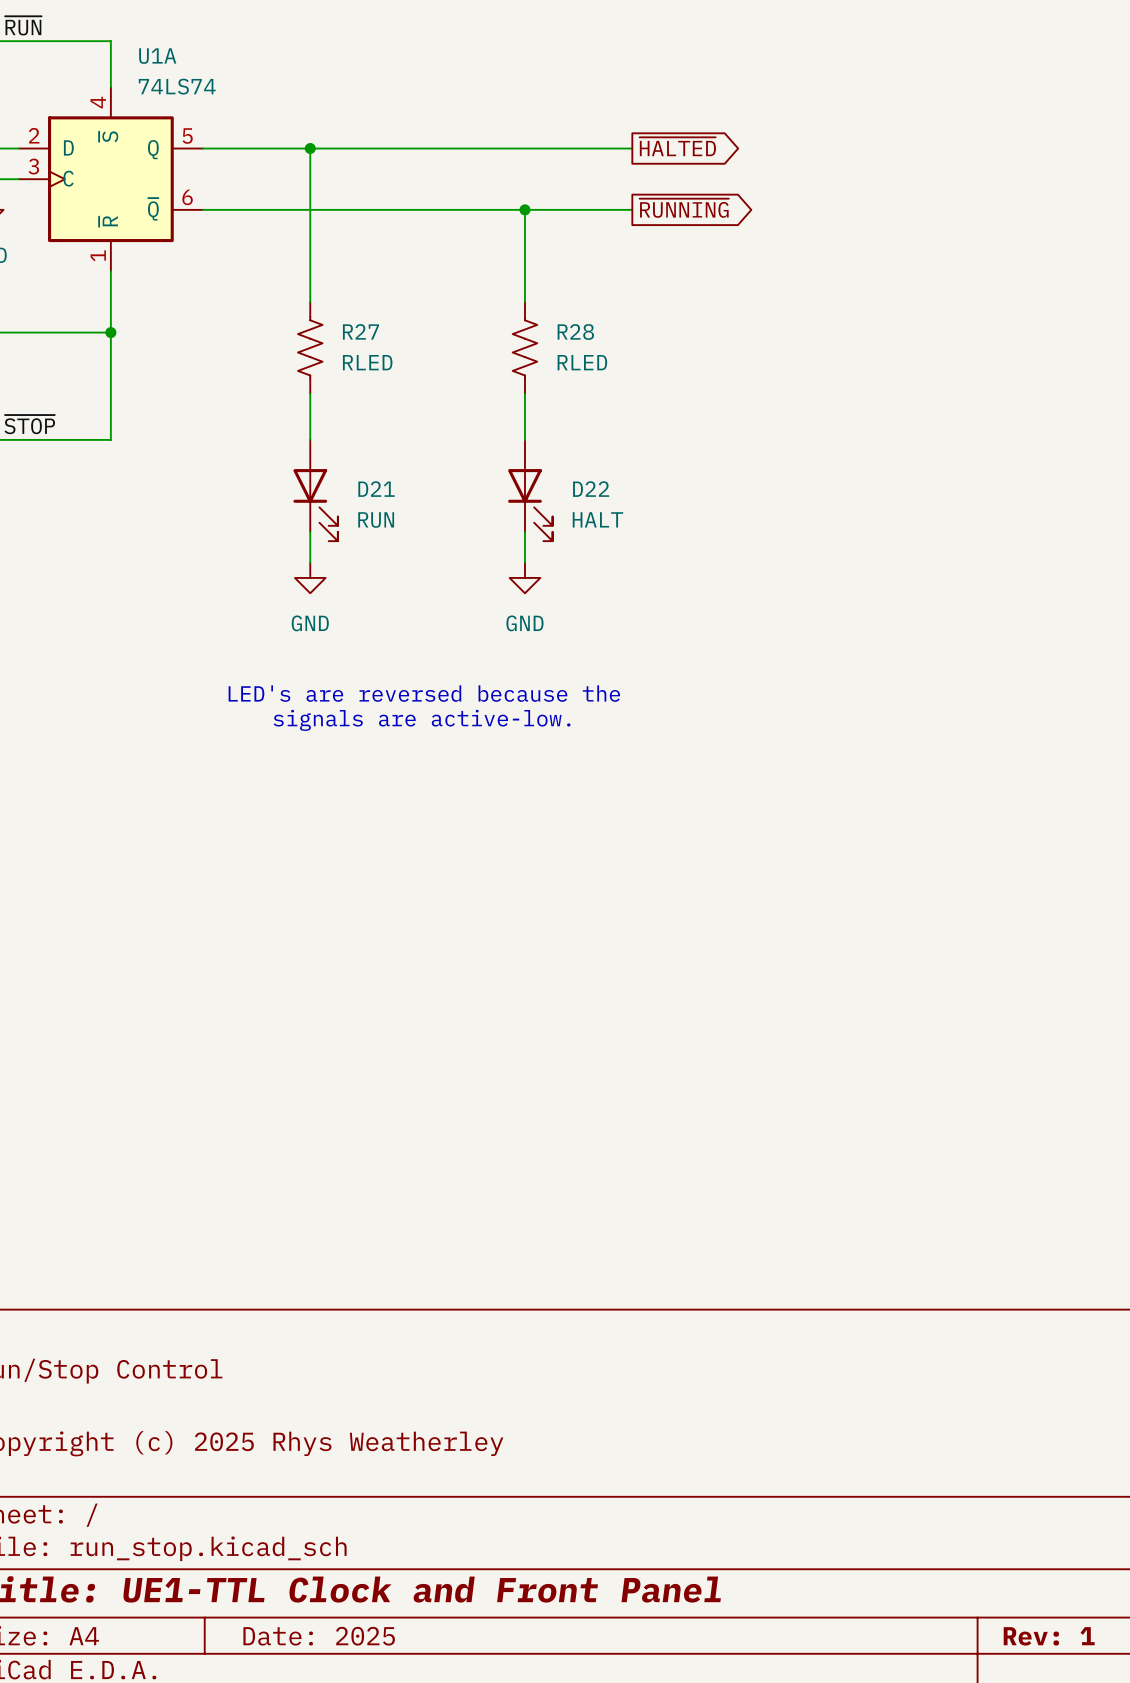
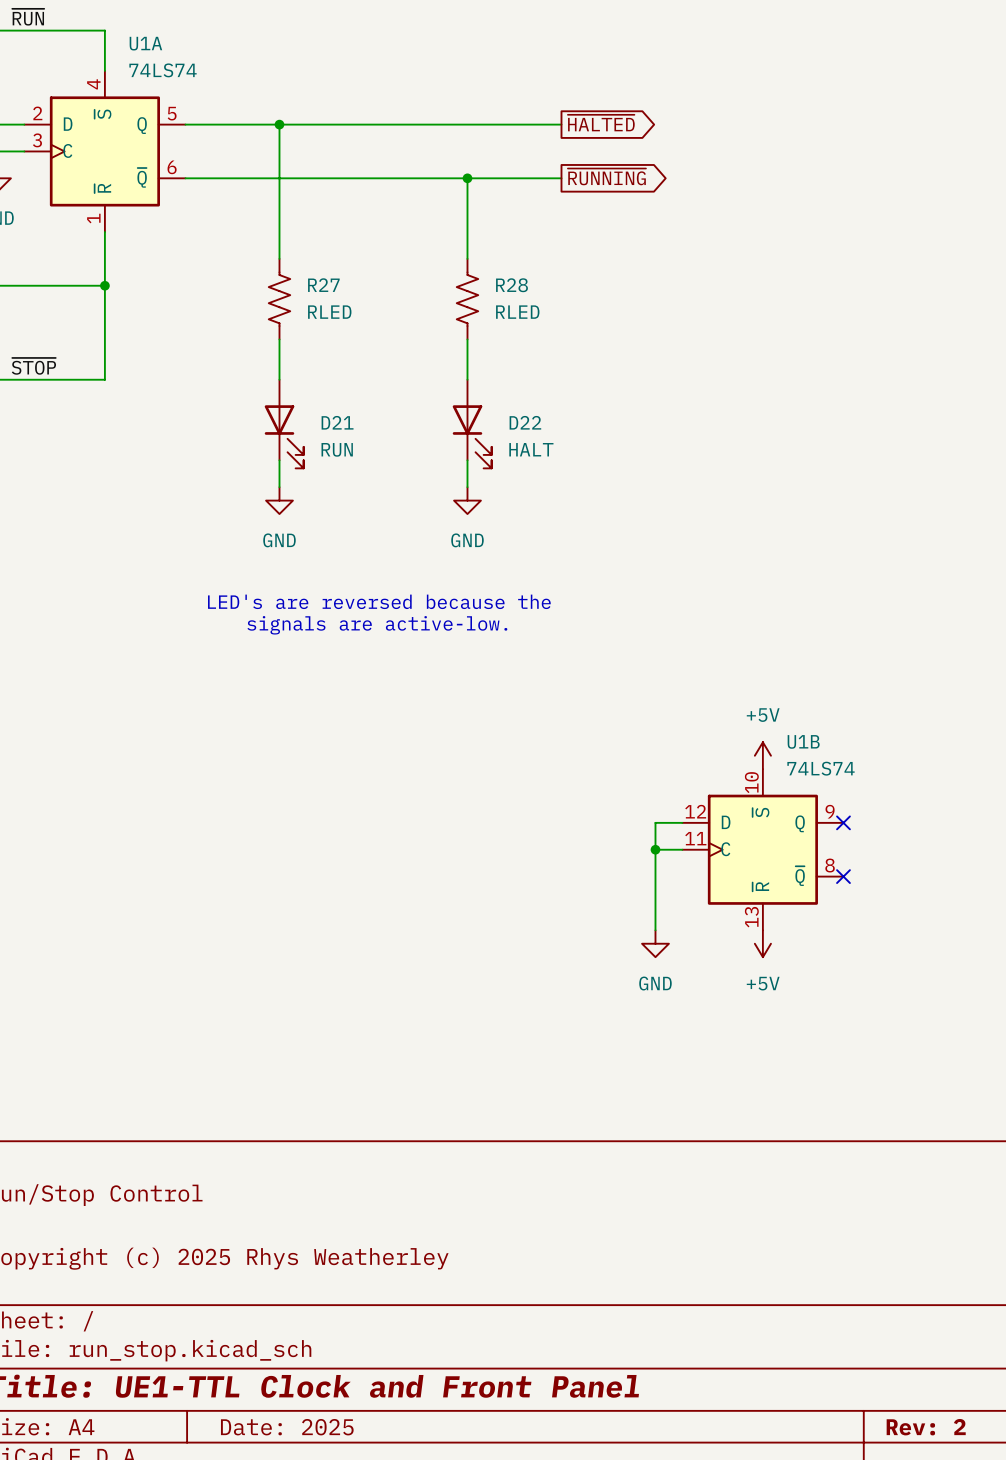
power symbol: none -> +5V (762, 755)
wire: none -> (682, 822) (655, 822) (655, 930)
no-connect mark: none -> (843, 822)
wire: none -> (655, 849) (682, 849)
junction: none -> (655, 849)
U1B: none -> 74LS74 (762, 849)
no-connect mark: none -> (843, 876)
power symbol: none -> GND (655, 943)
power symbol: none -> +5V (762, 943)
title block: Rev: 1 (1049, 1636) -> Rev: 2 (926, 1427)

